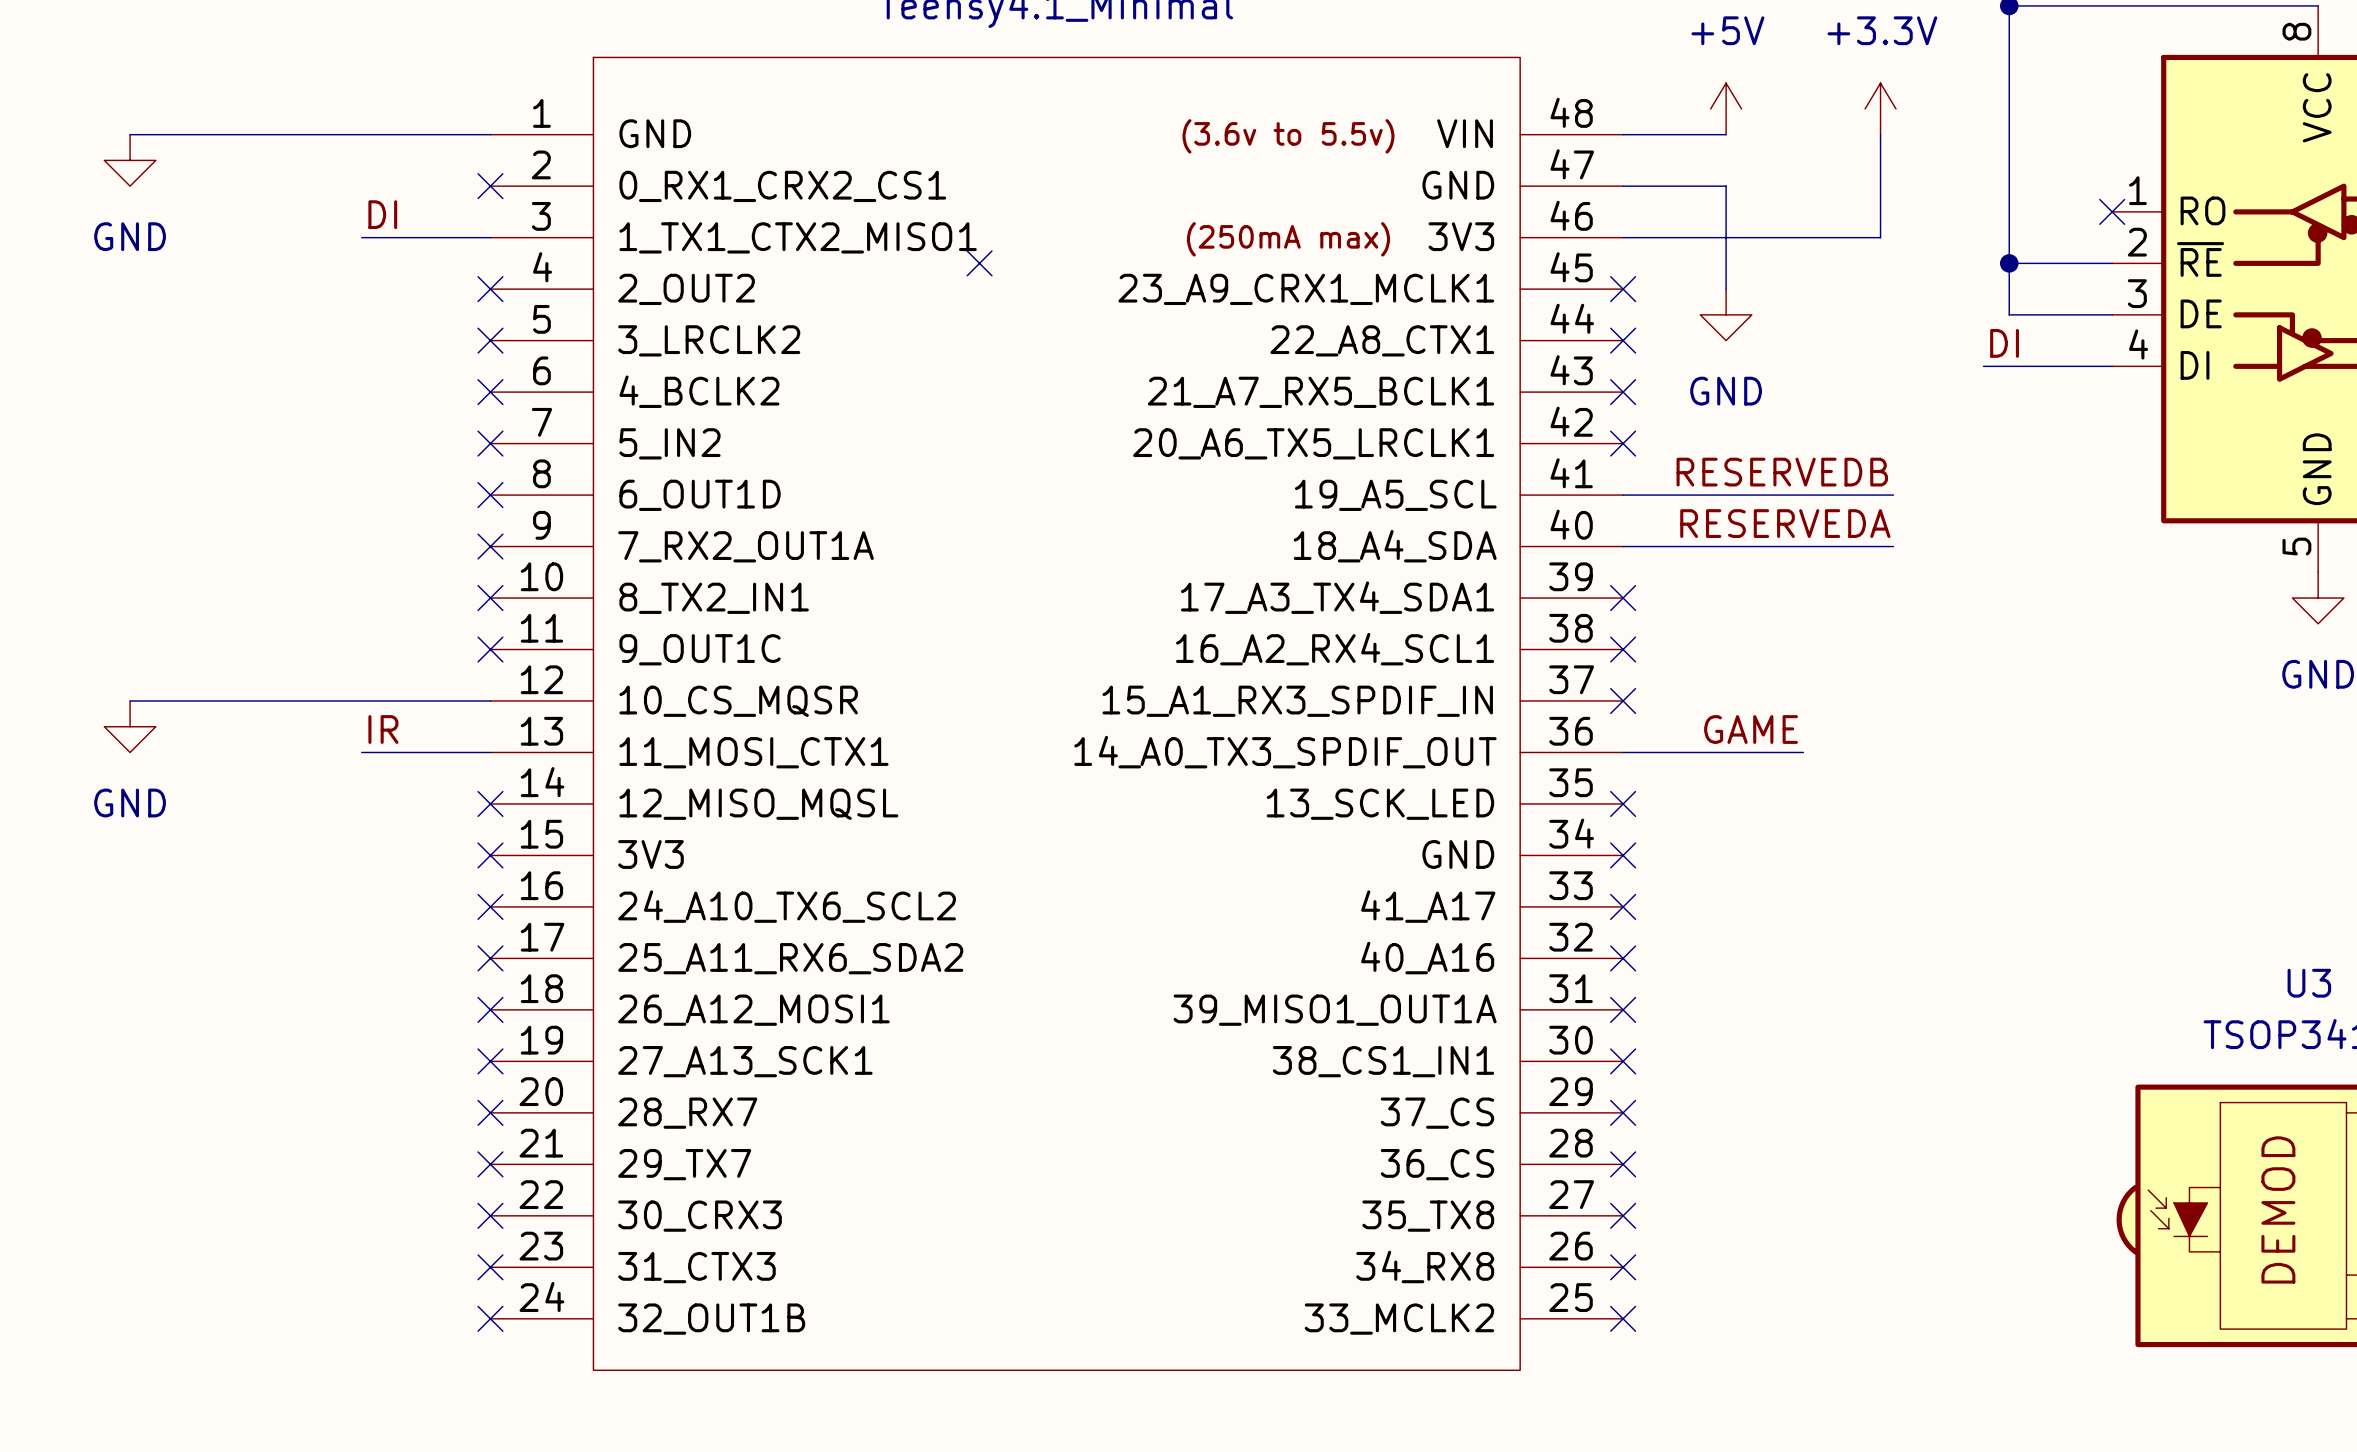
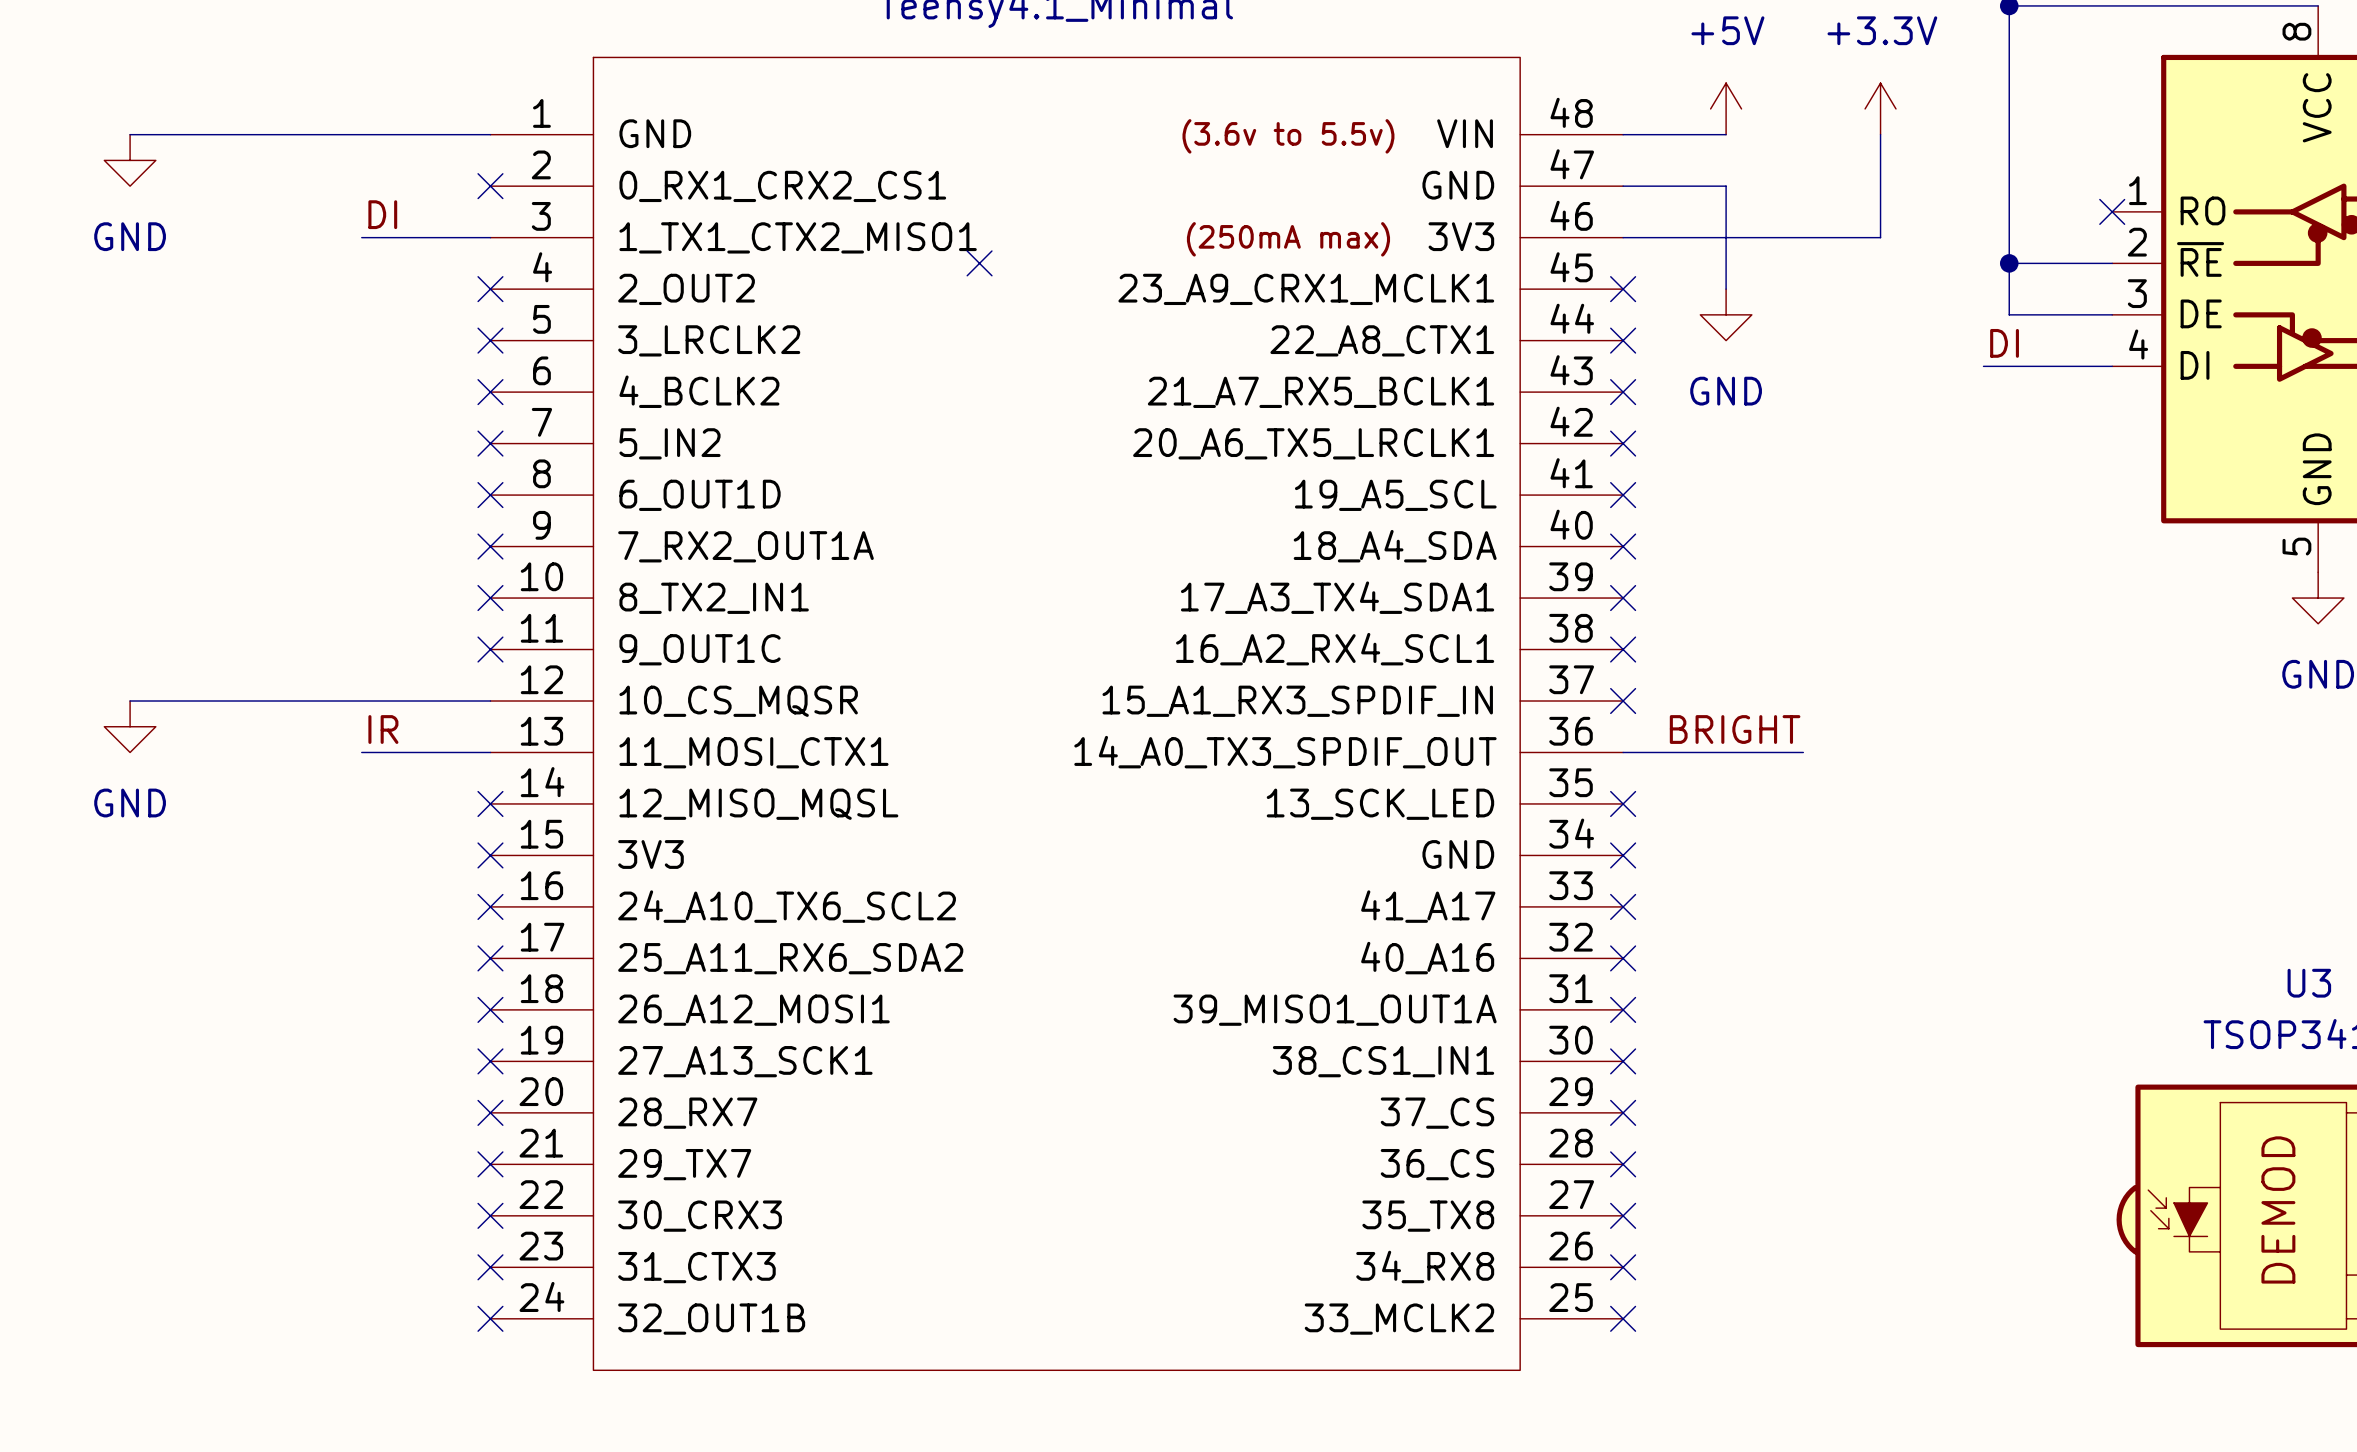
label: RESERVEDB (1782, 472) -> none
wire: (1623, 495) (1893, 495) -> none
no-connect mark: none -> (1623, 495)
label: RESERVEDA (1785, 523) -> none
wire: (1623, 546) (1893, 546) -> none
no-connect mark: none -> (1623, 546)
label: GAME (1751, 729) -> BRIGHT (1735, 729)

